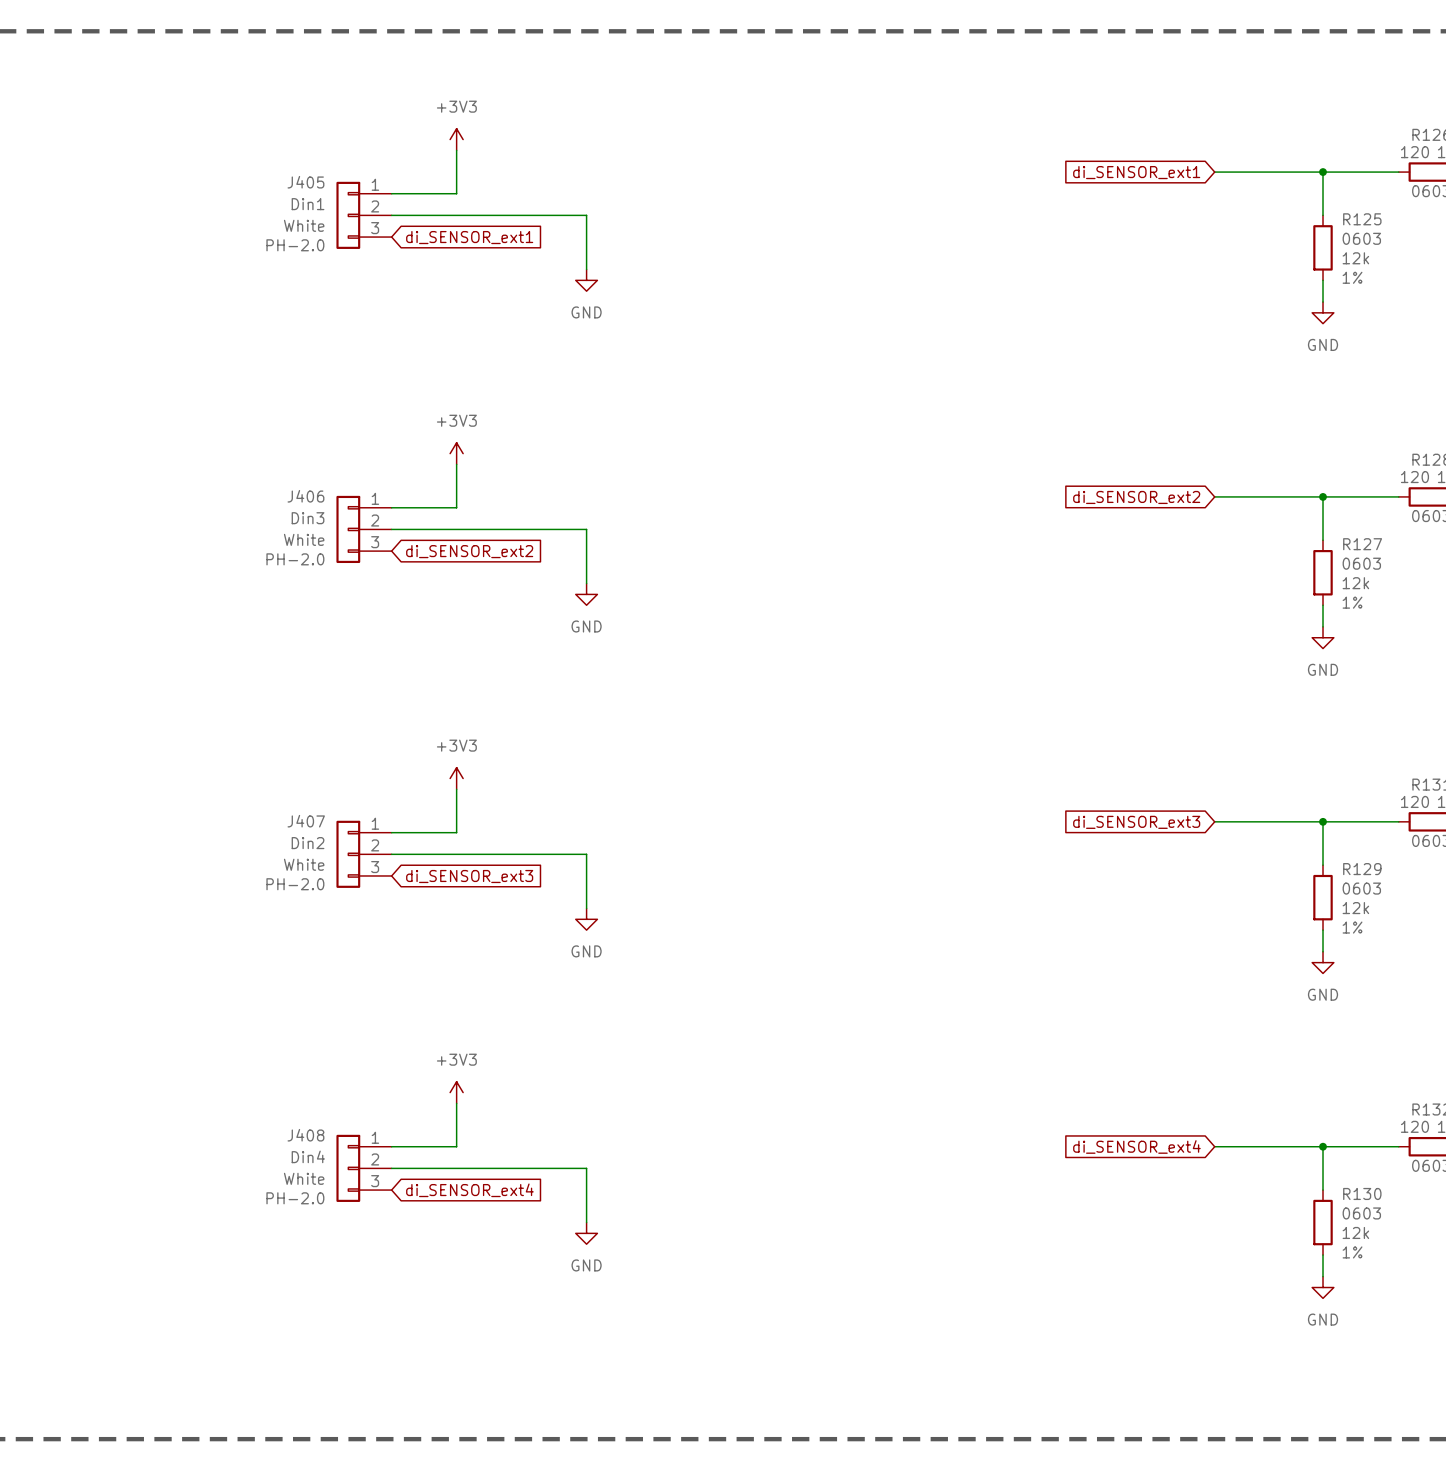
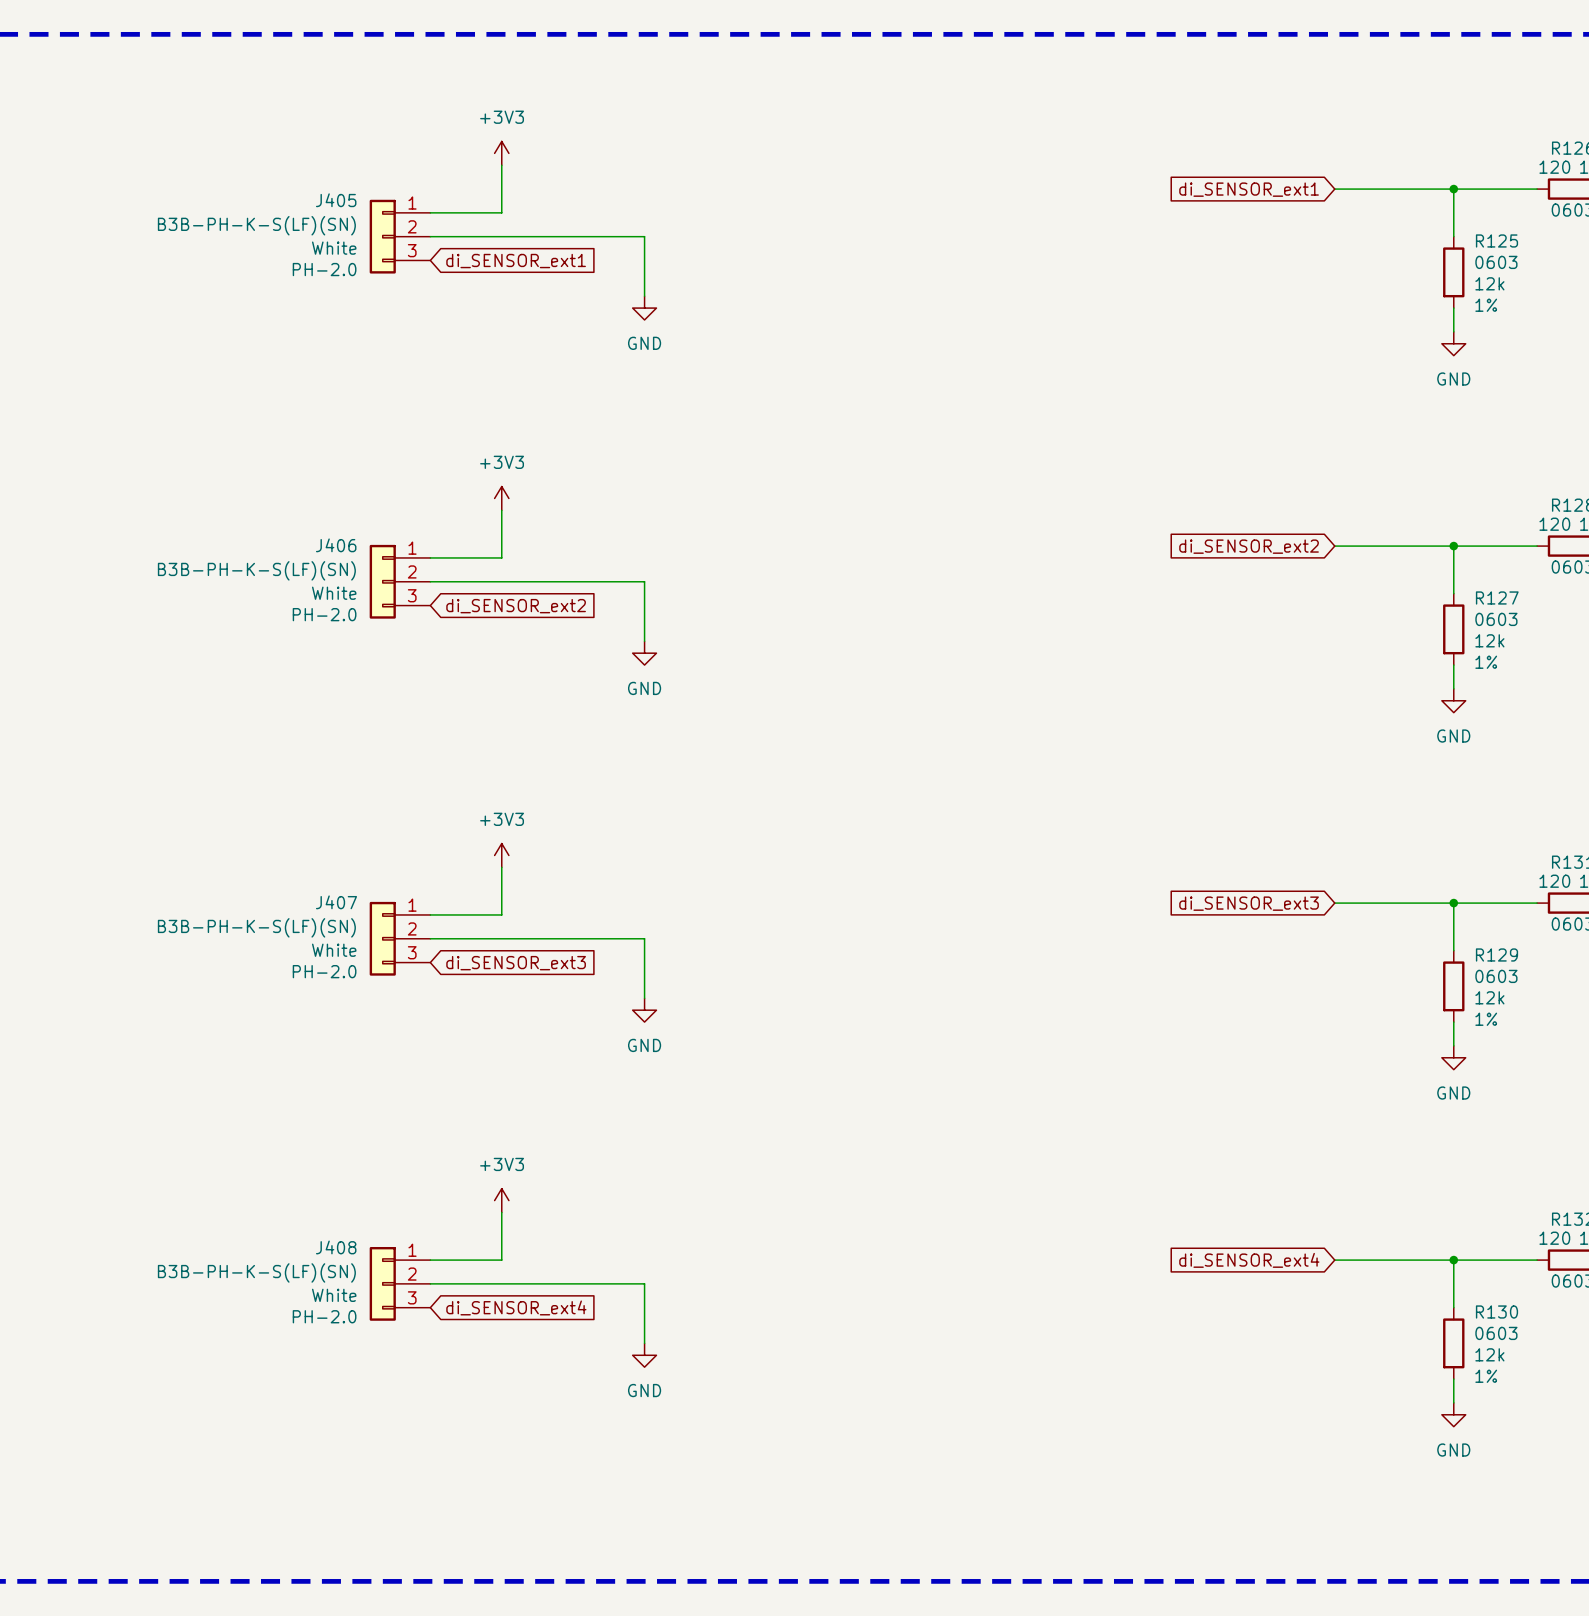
J405 value: Din1 (308, 204) -> B3B-PH-K-S(LF)(SN) (256, 225)
J406 value: Din3 (308, 518) -> B3B-PH-K-S(LF)(SN) (256, 570)
J407 value: Din2 (308, 843) -> B3B-PH-K-S(LF)(SN) (256, 927)
J408 value: Din4 (308, 1156) -> B3B-PH-K-S(LF)(SN) (256, 1272)

